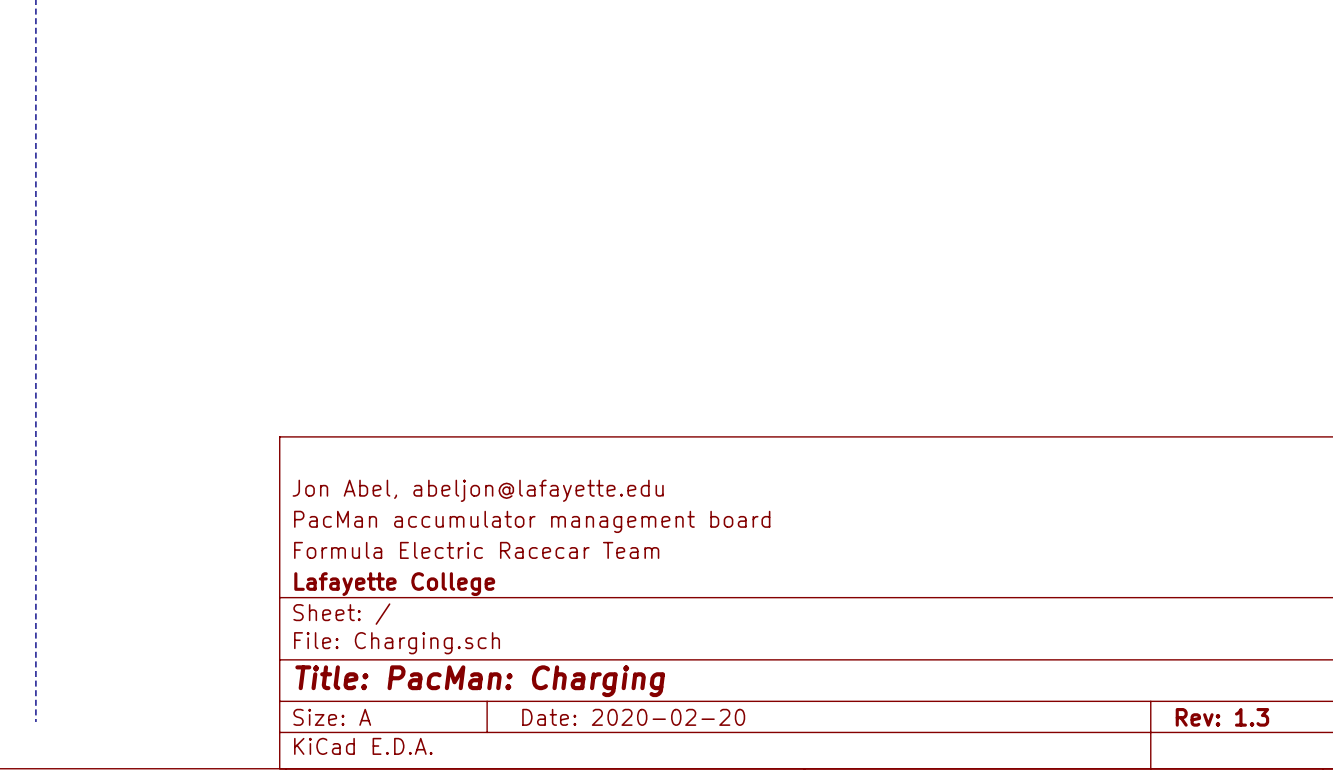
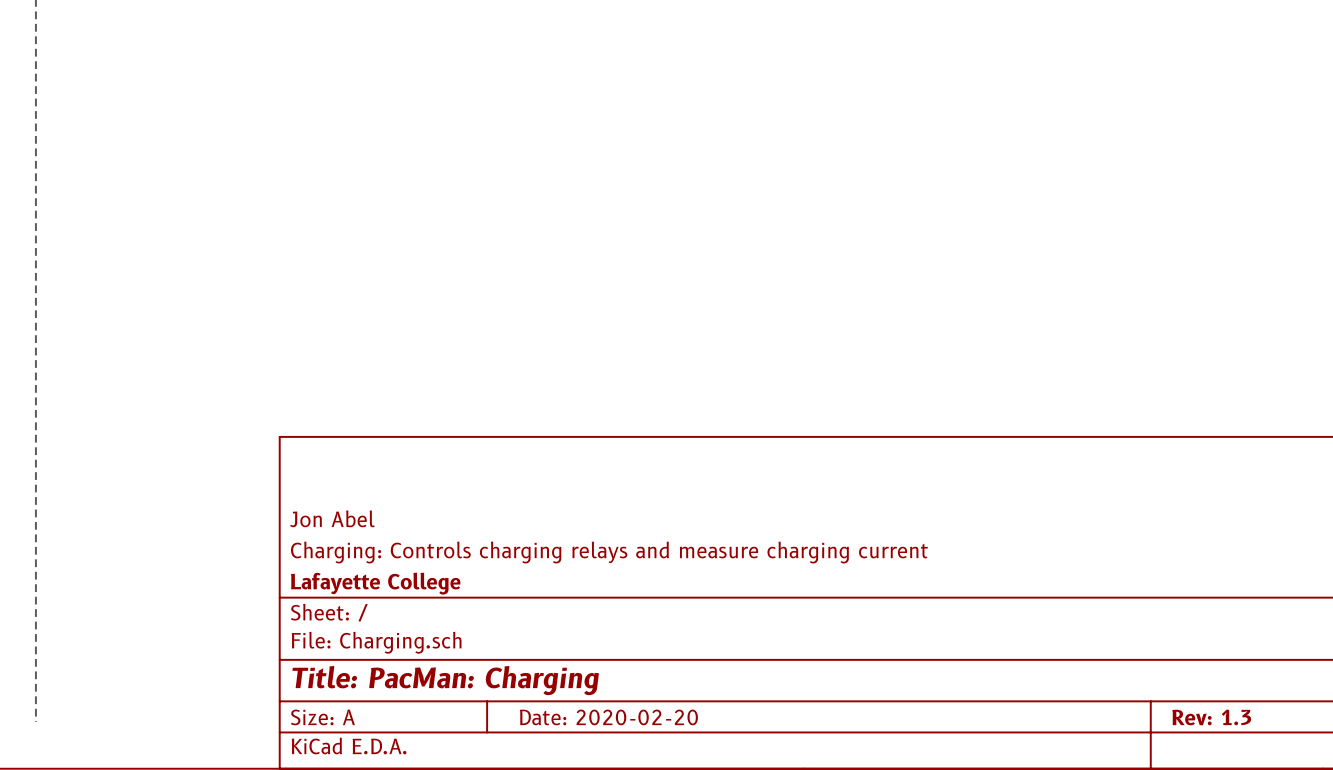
title block: Jon Abel, abeljon@lafayette.edu (478, 490) -> none
title block: PacMan accumulator management board (532, 521) -> Jon Abel (332, 518)
title block: Formula Electric Racecar Team (476, 550) -> Charging: Controls charging relays and measure charging current (609, 552)

